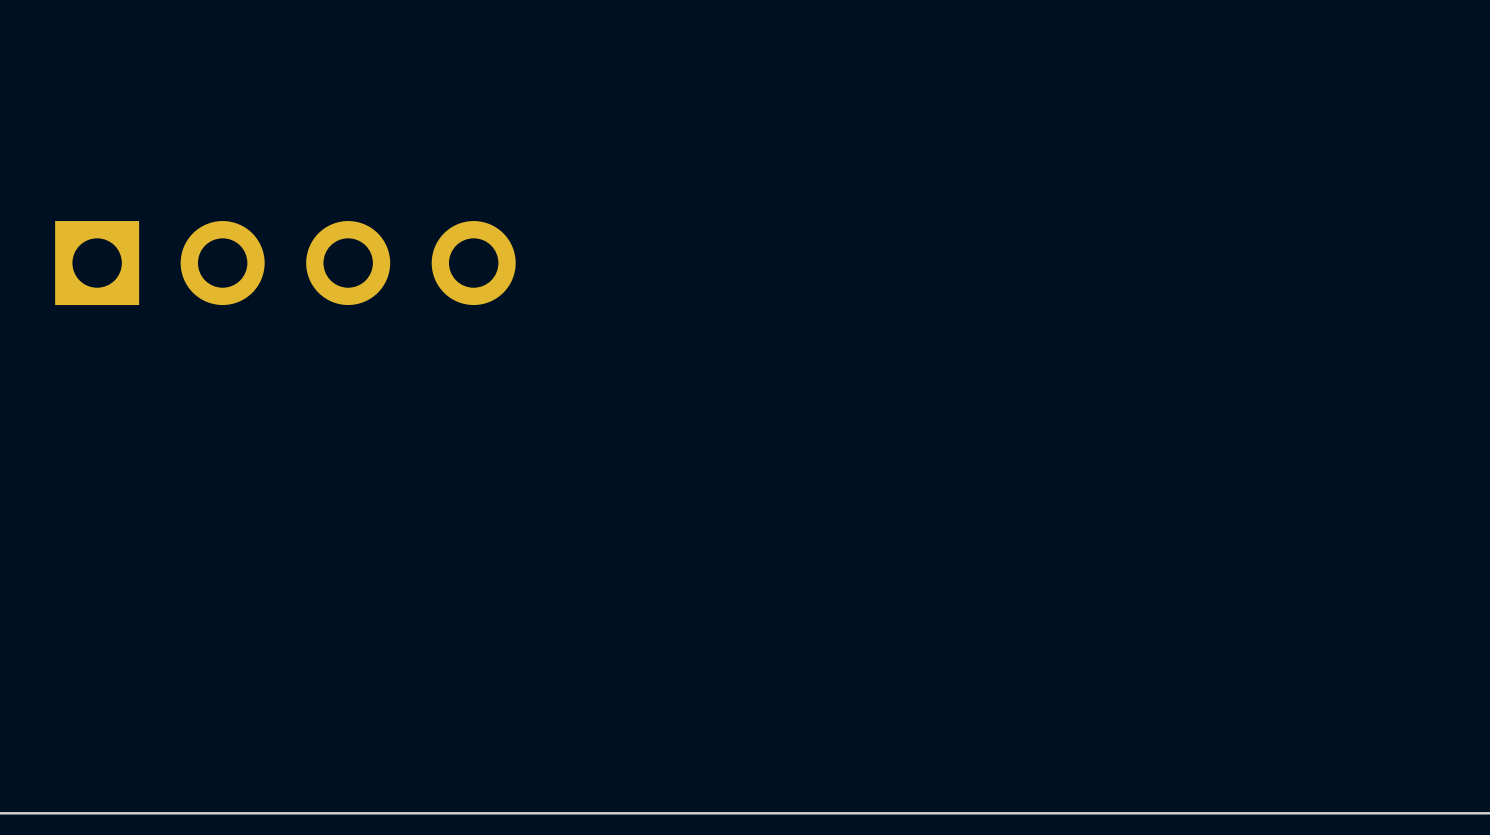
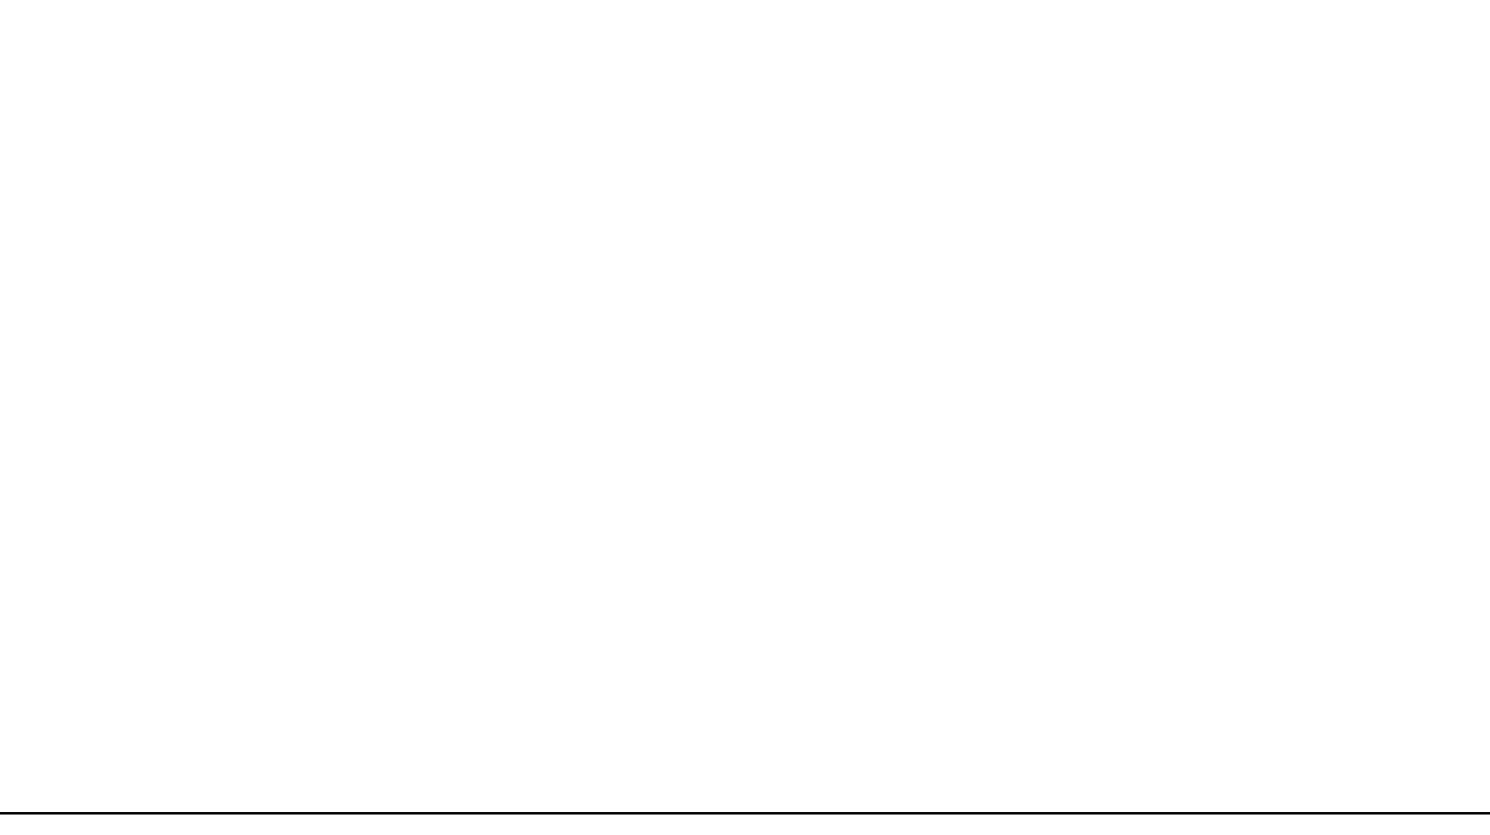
part: (285, 263) -> none

